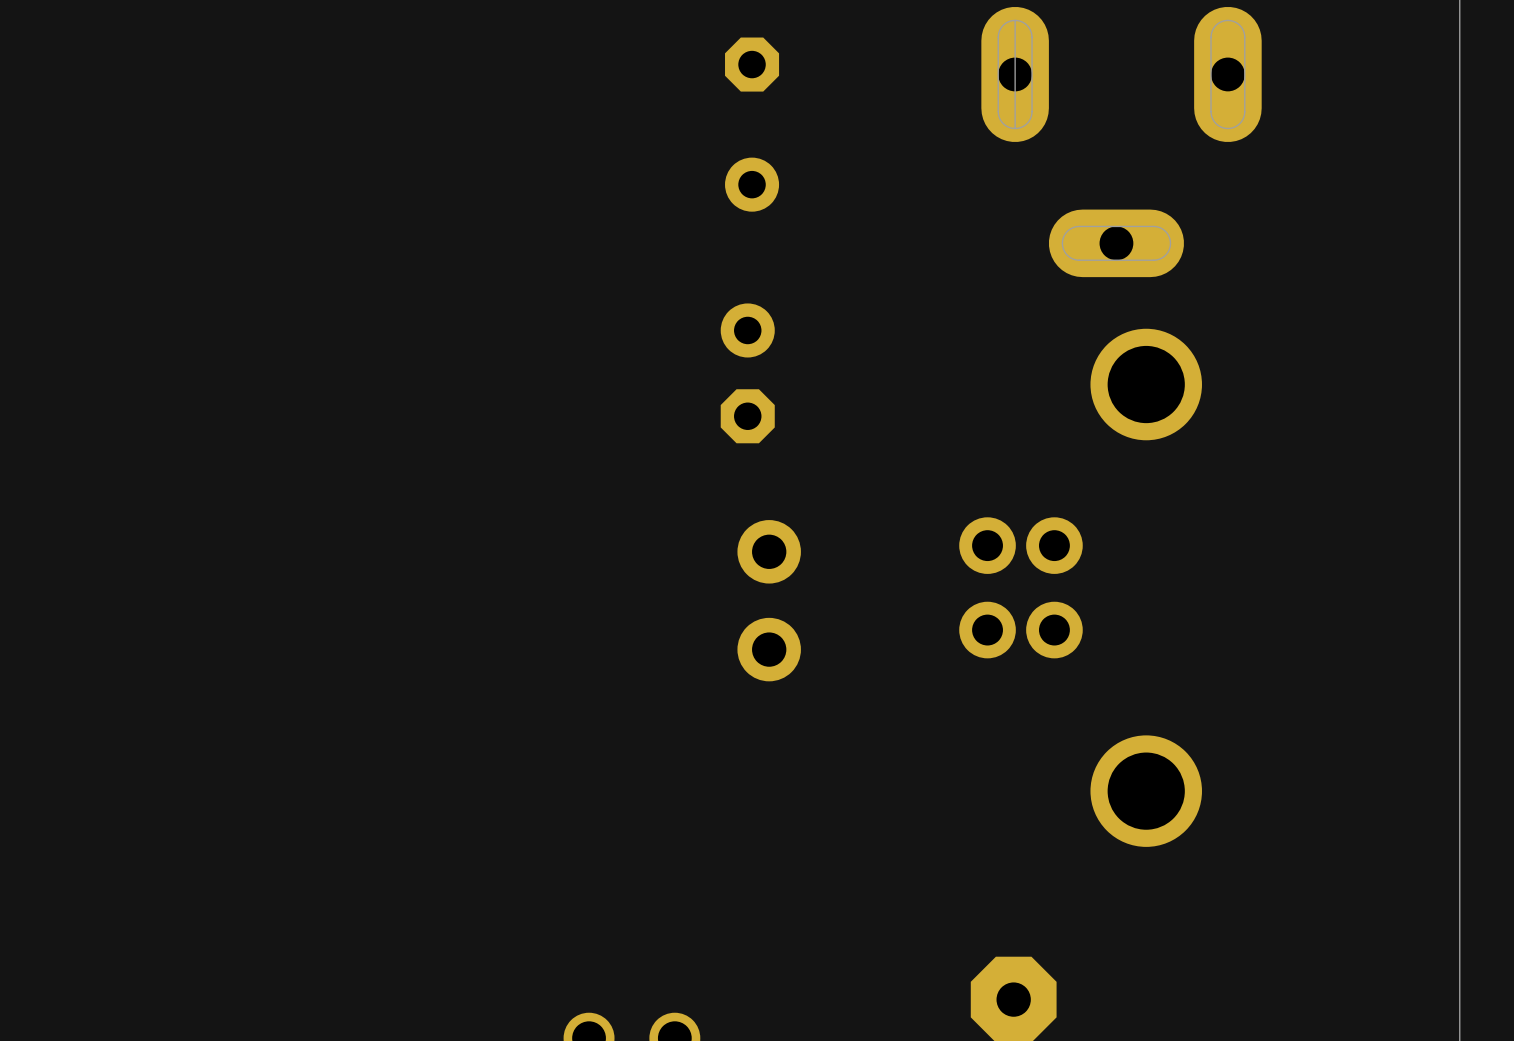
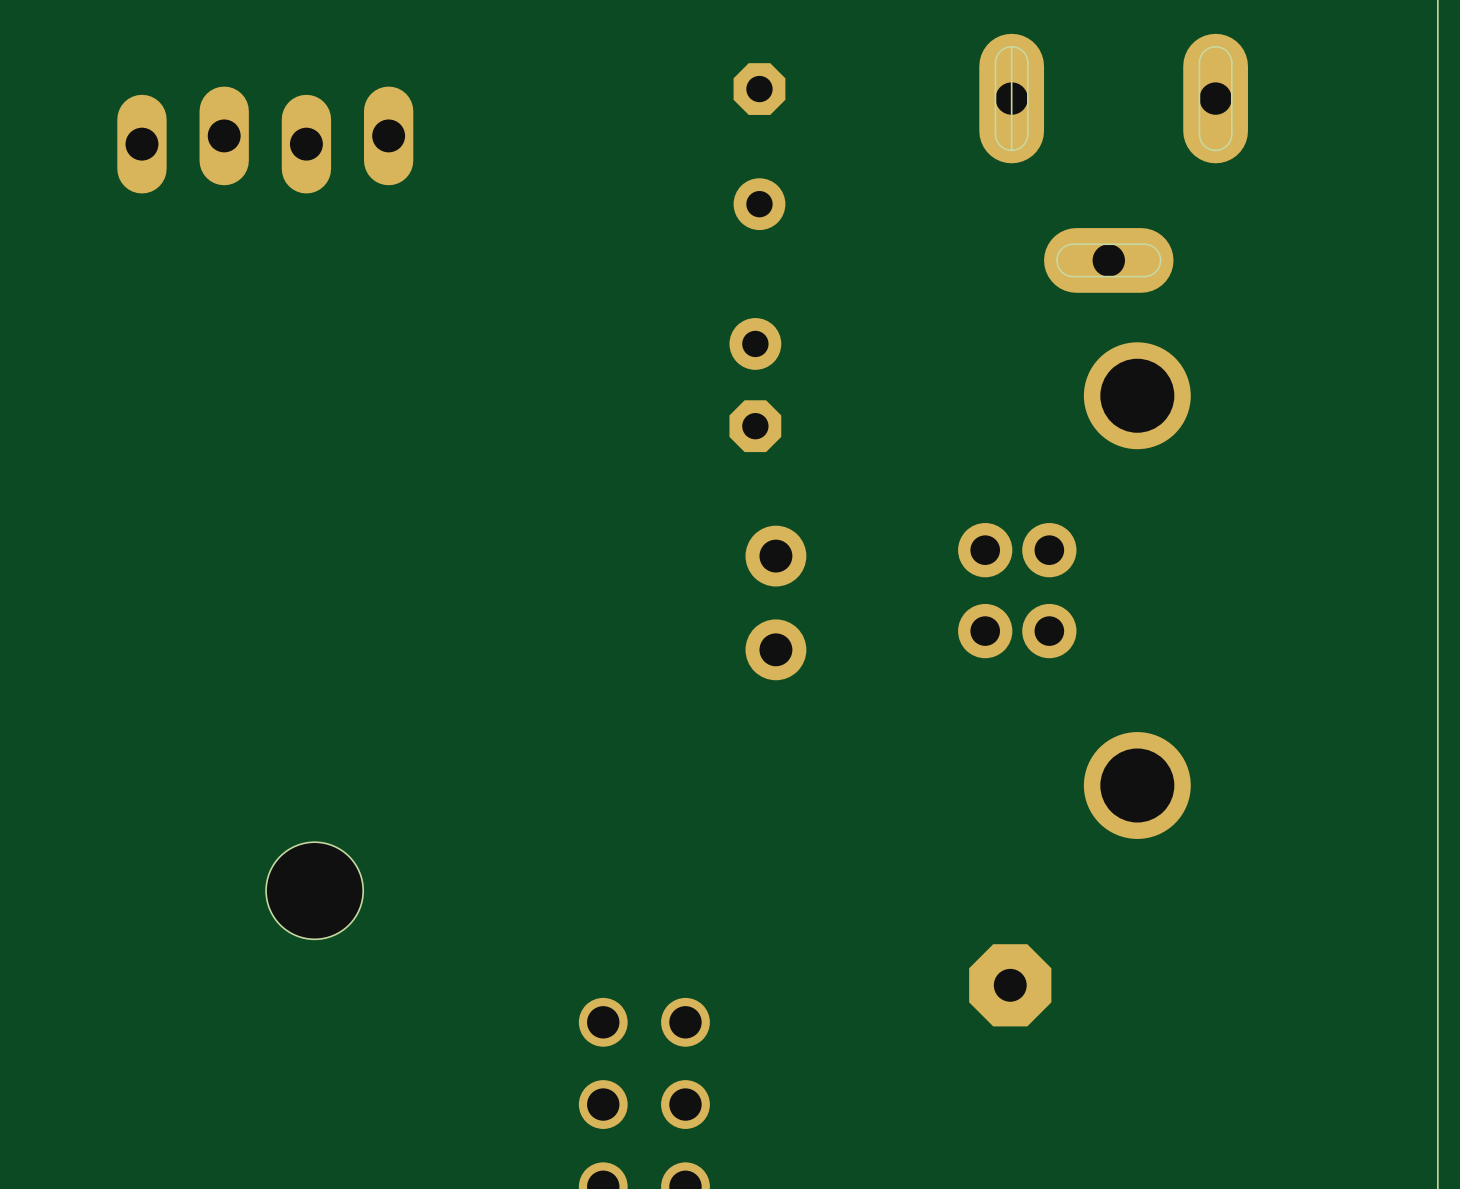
part: none -> (265, 140)
part: none -> (314, 890)

